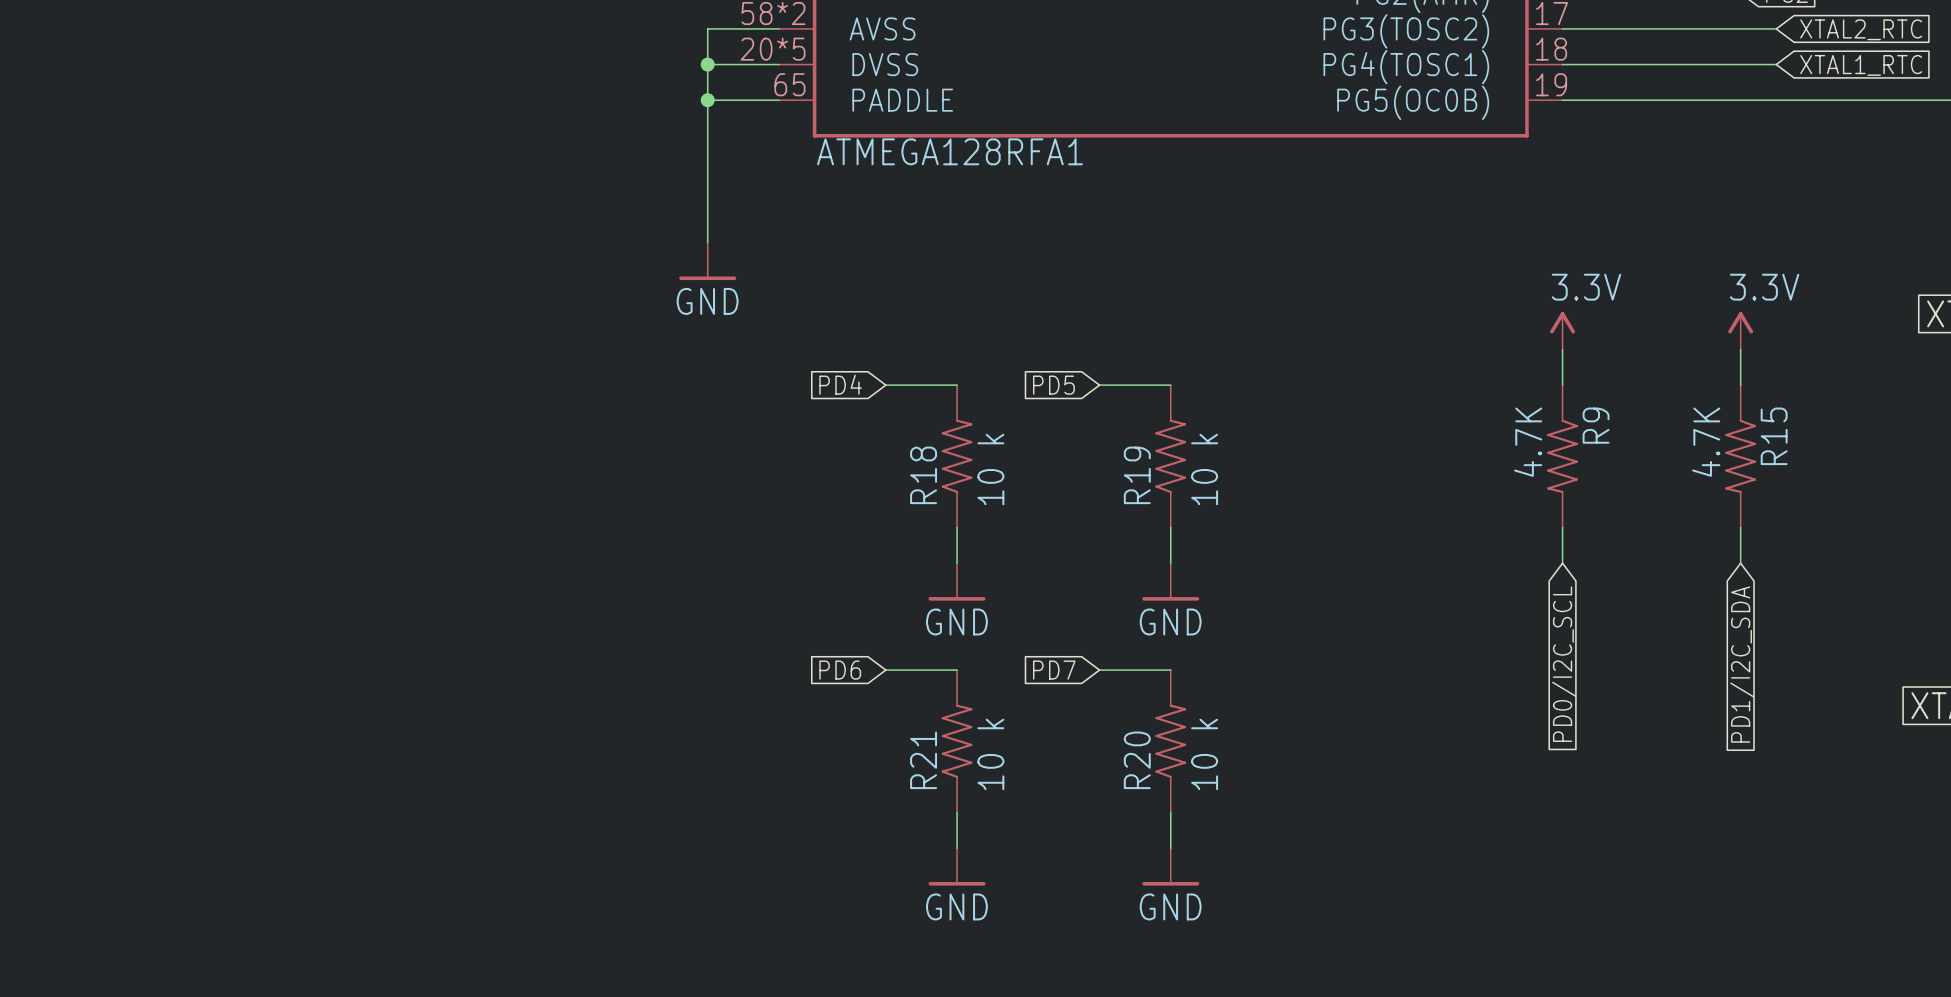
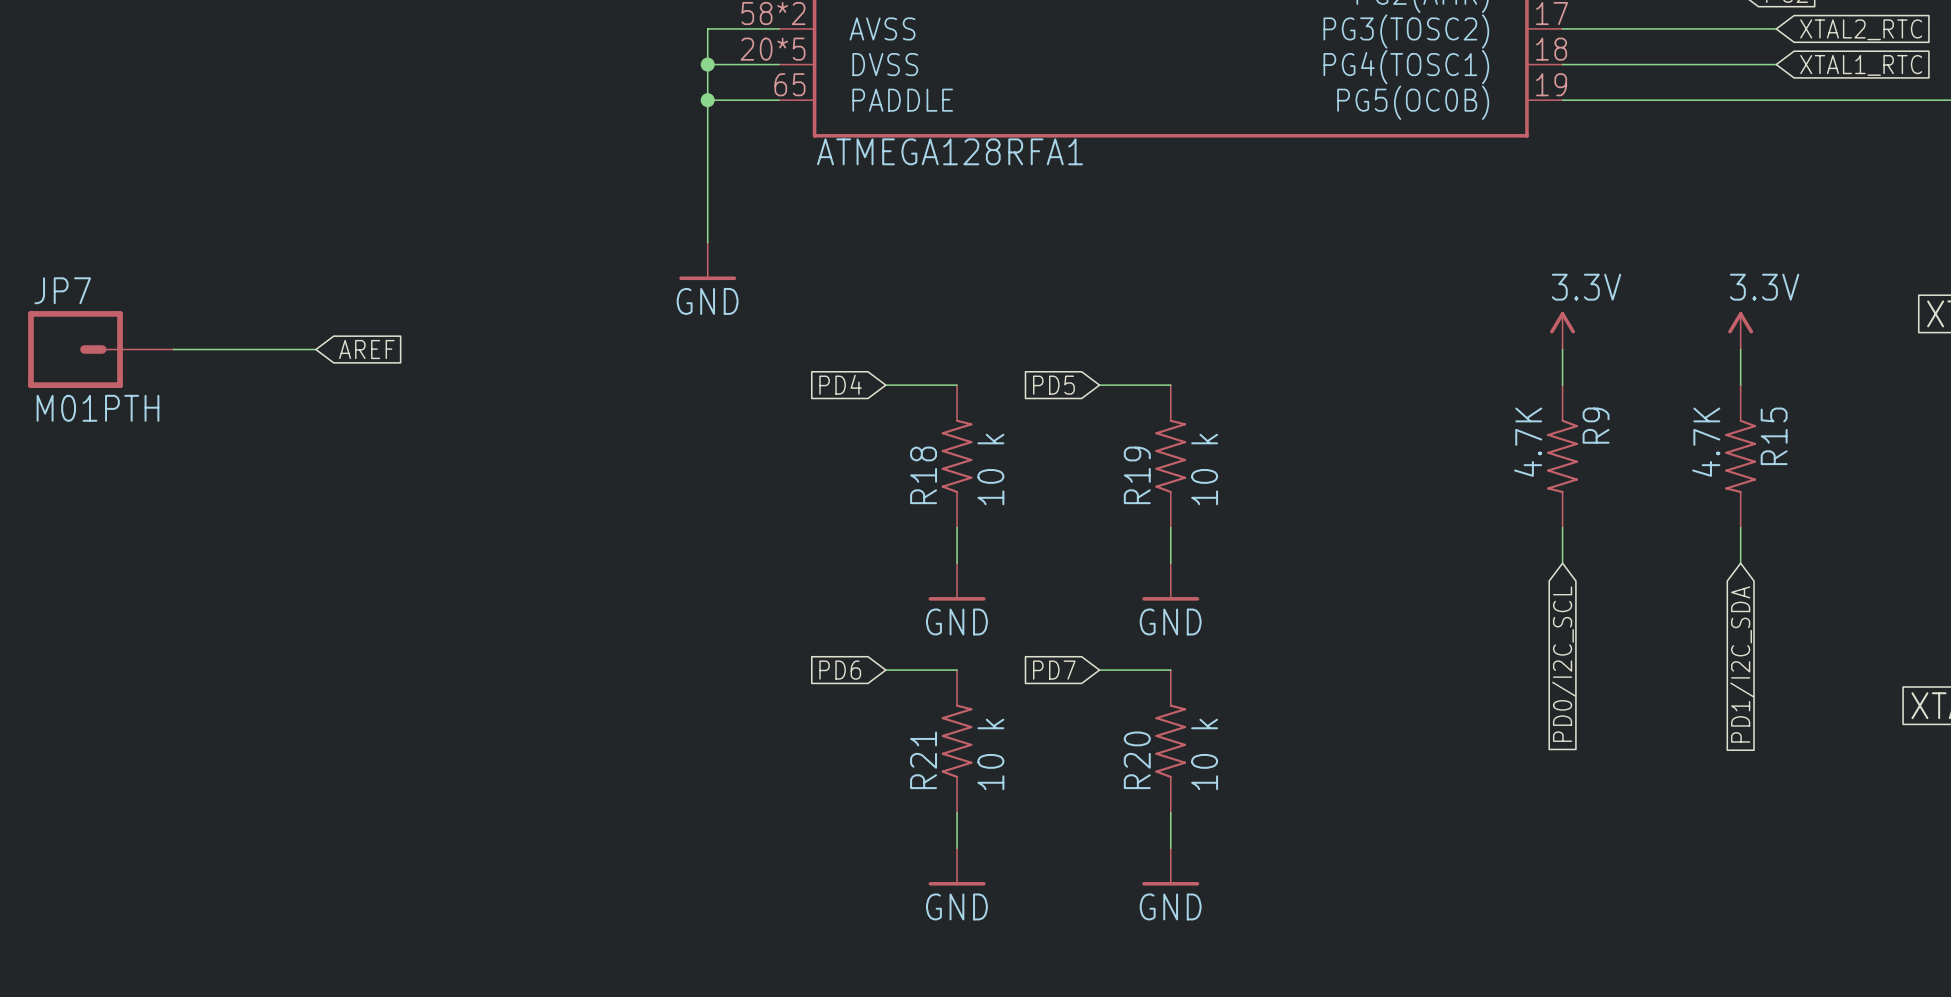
JP7: none -> M01PTH (100, 349)
wire: none -> (173, 349) (315, 349)
global label: none -> AREF (366, 349)

